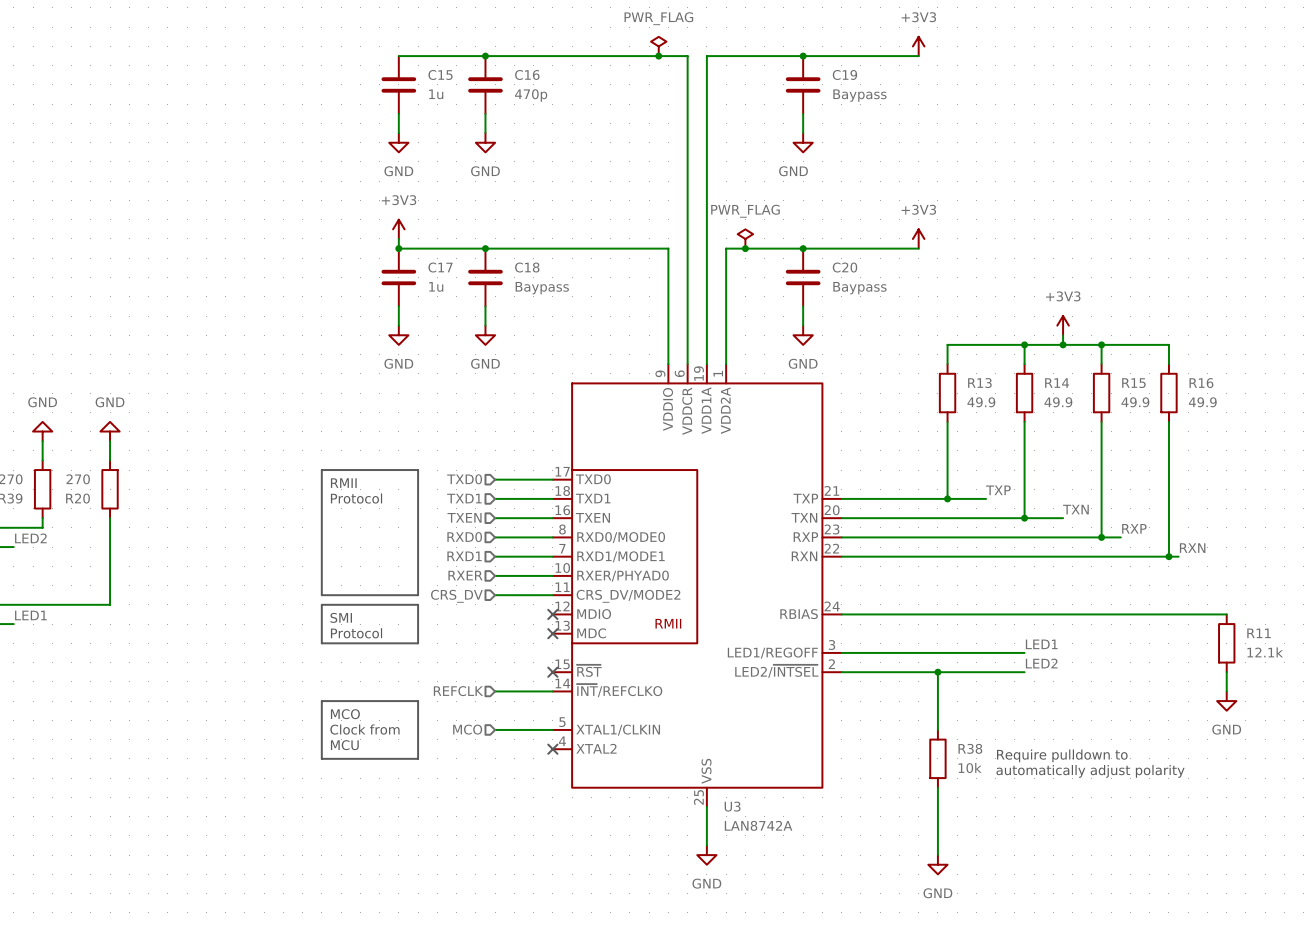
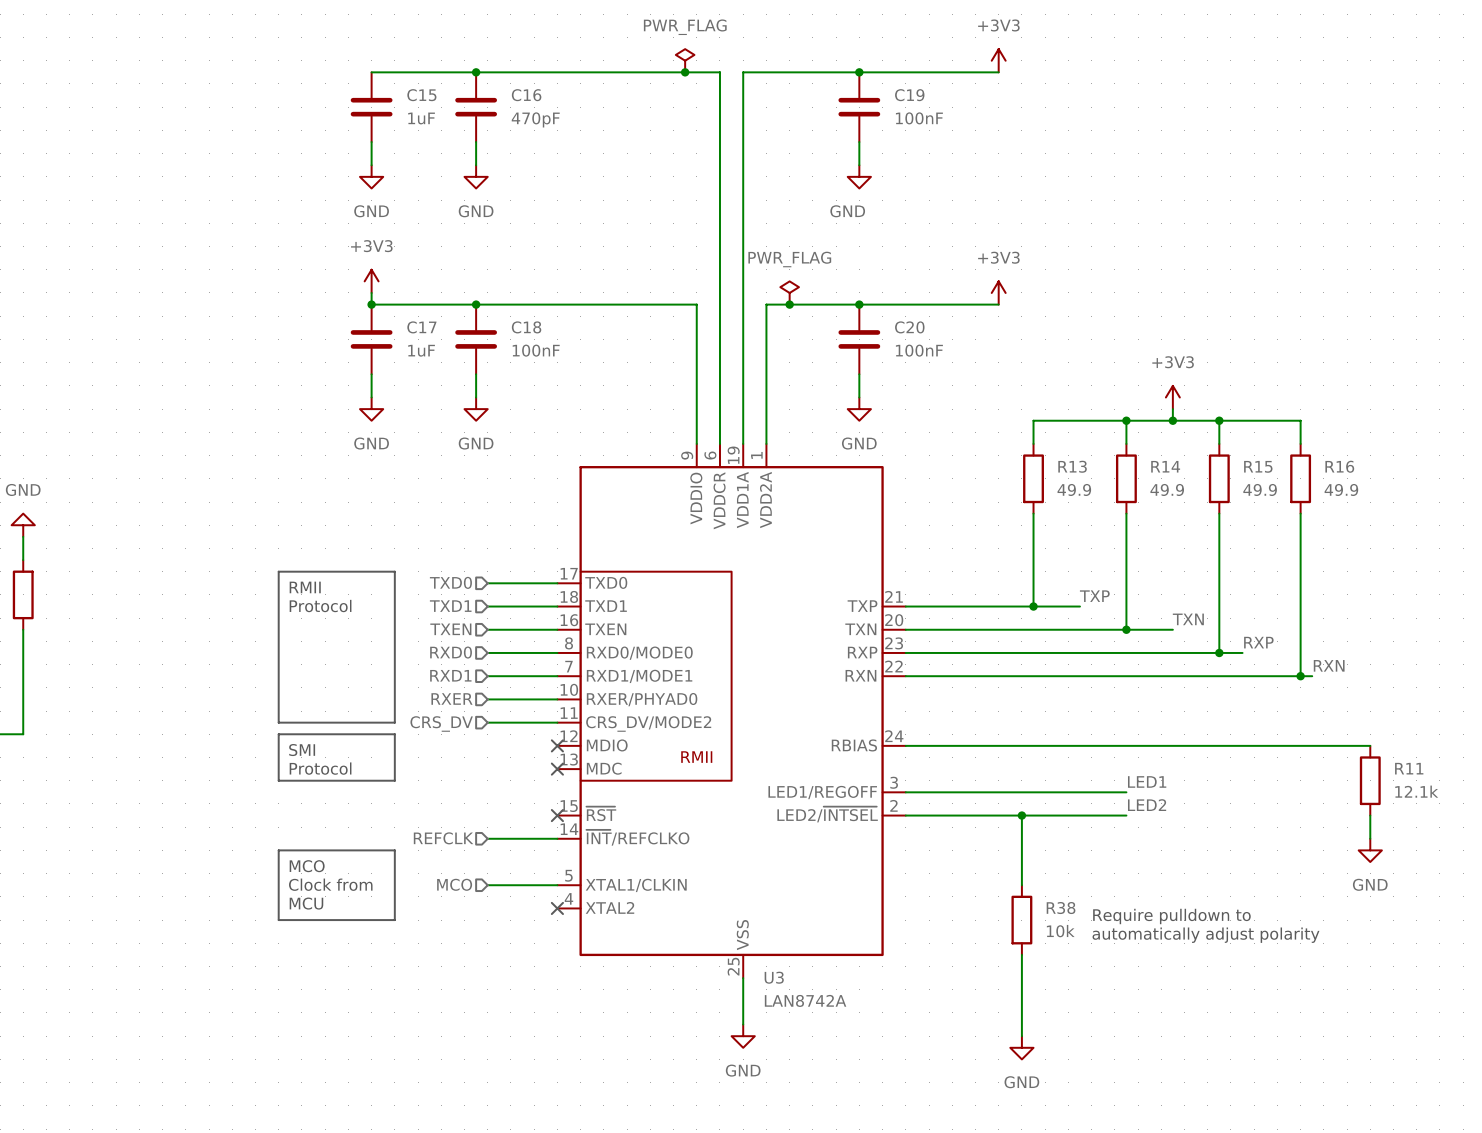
C15 value: 1u (436, 94) -> 1uF (421, 118)
C16 value: 470p (531, 95) -> 470pF (535, 119)
C19 value: Baypass (859, 95) -> 100nF (919, 118)
C17 value: 1u (436, 286) -> 1uF (421, 350)
C18 value: Baypass (542, 288) -> 100nF (536, 350)
C20 value: Baypass (859, 288) -> 100nF (919, 350)

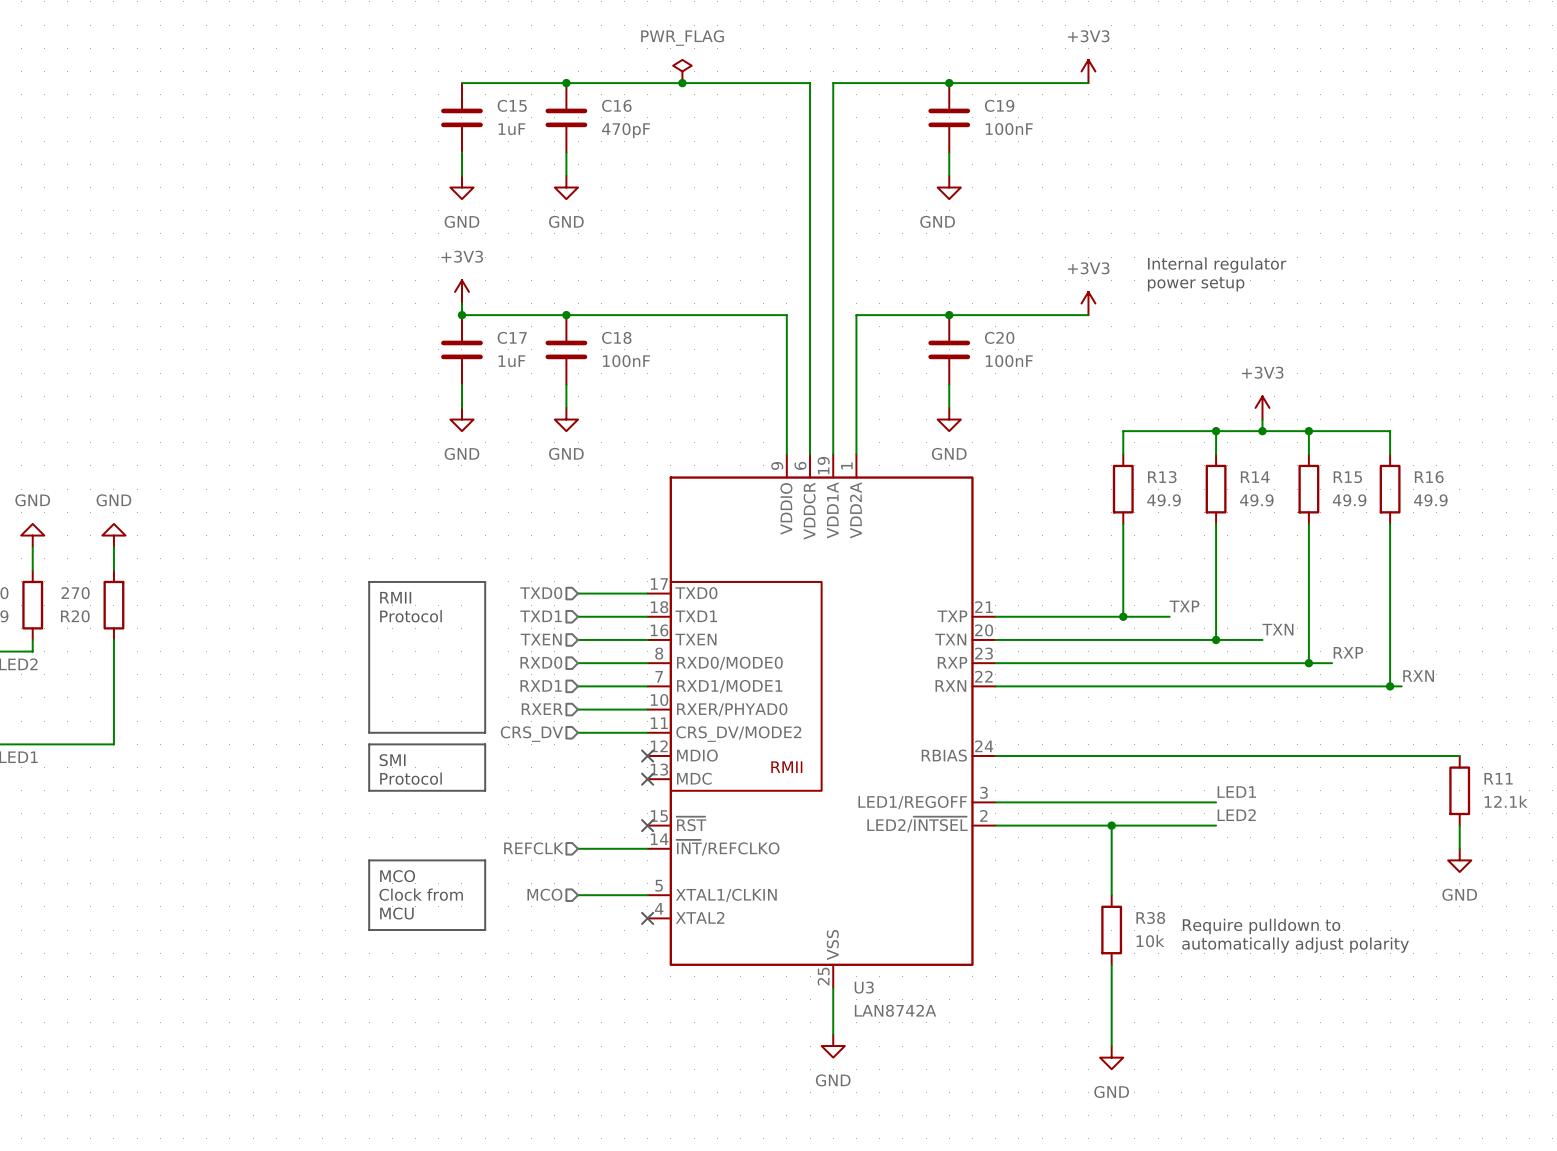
power symbol position: PWR_FLAG (685, 60) -> PWR_FLAG (682, 71)
junction: none -> (682, 83)
junction: (685, 72) -> none
text: none -> Internal regulator (1217, 265)
text: none -> power setup (1196, 284)
power symbol: PWR_FLAG (789, 292) -> none
junction: (789, 304) -> none

